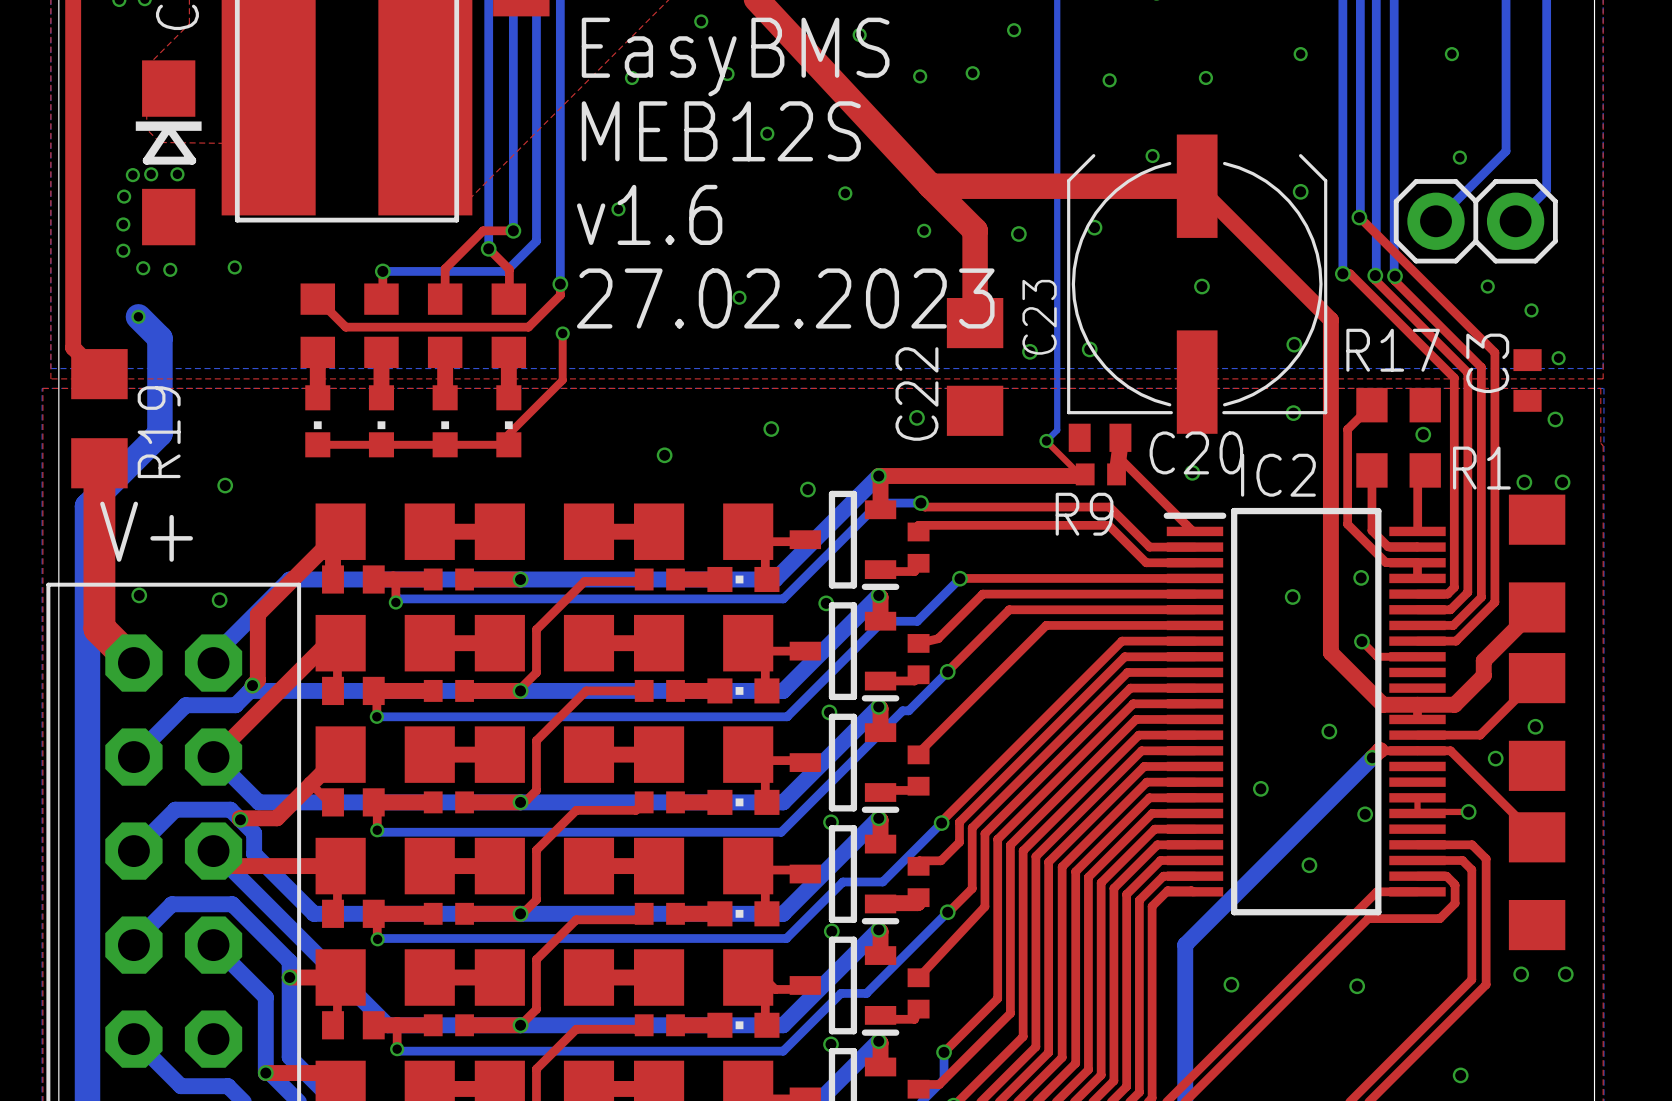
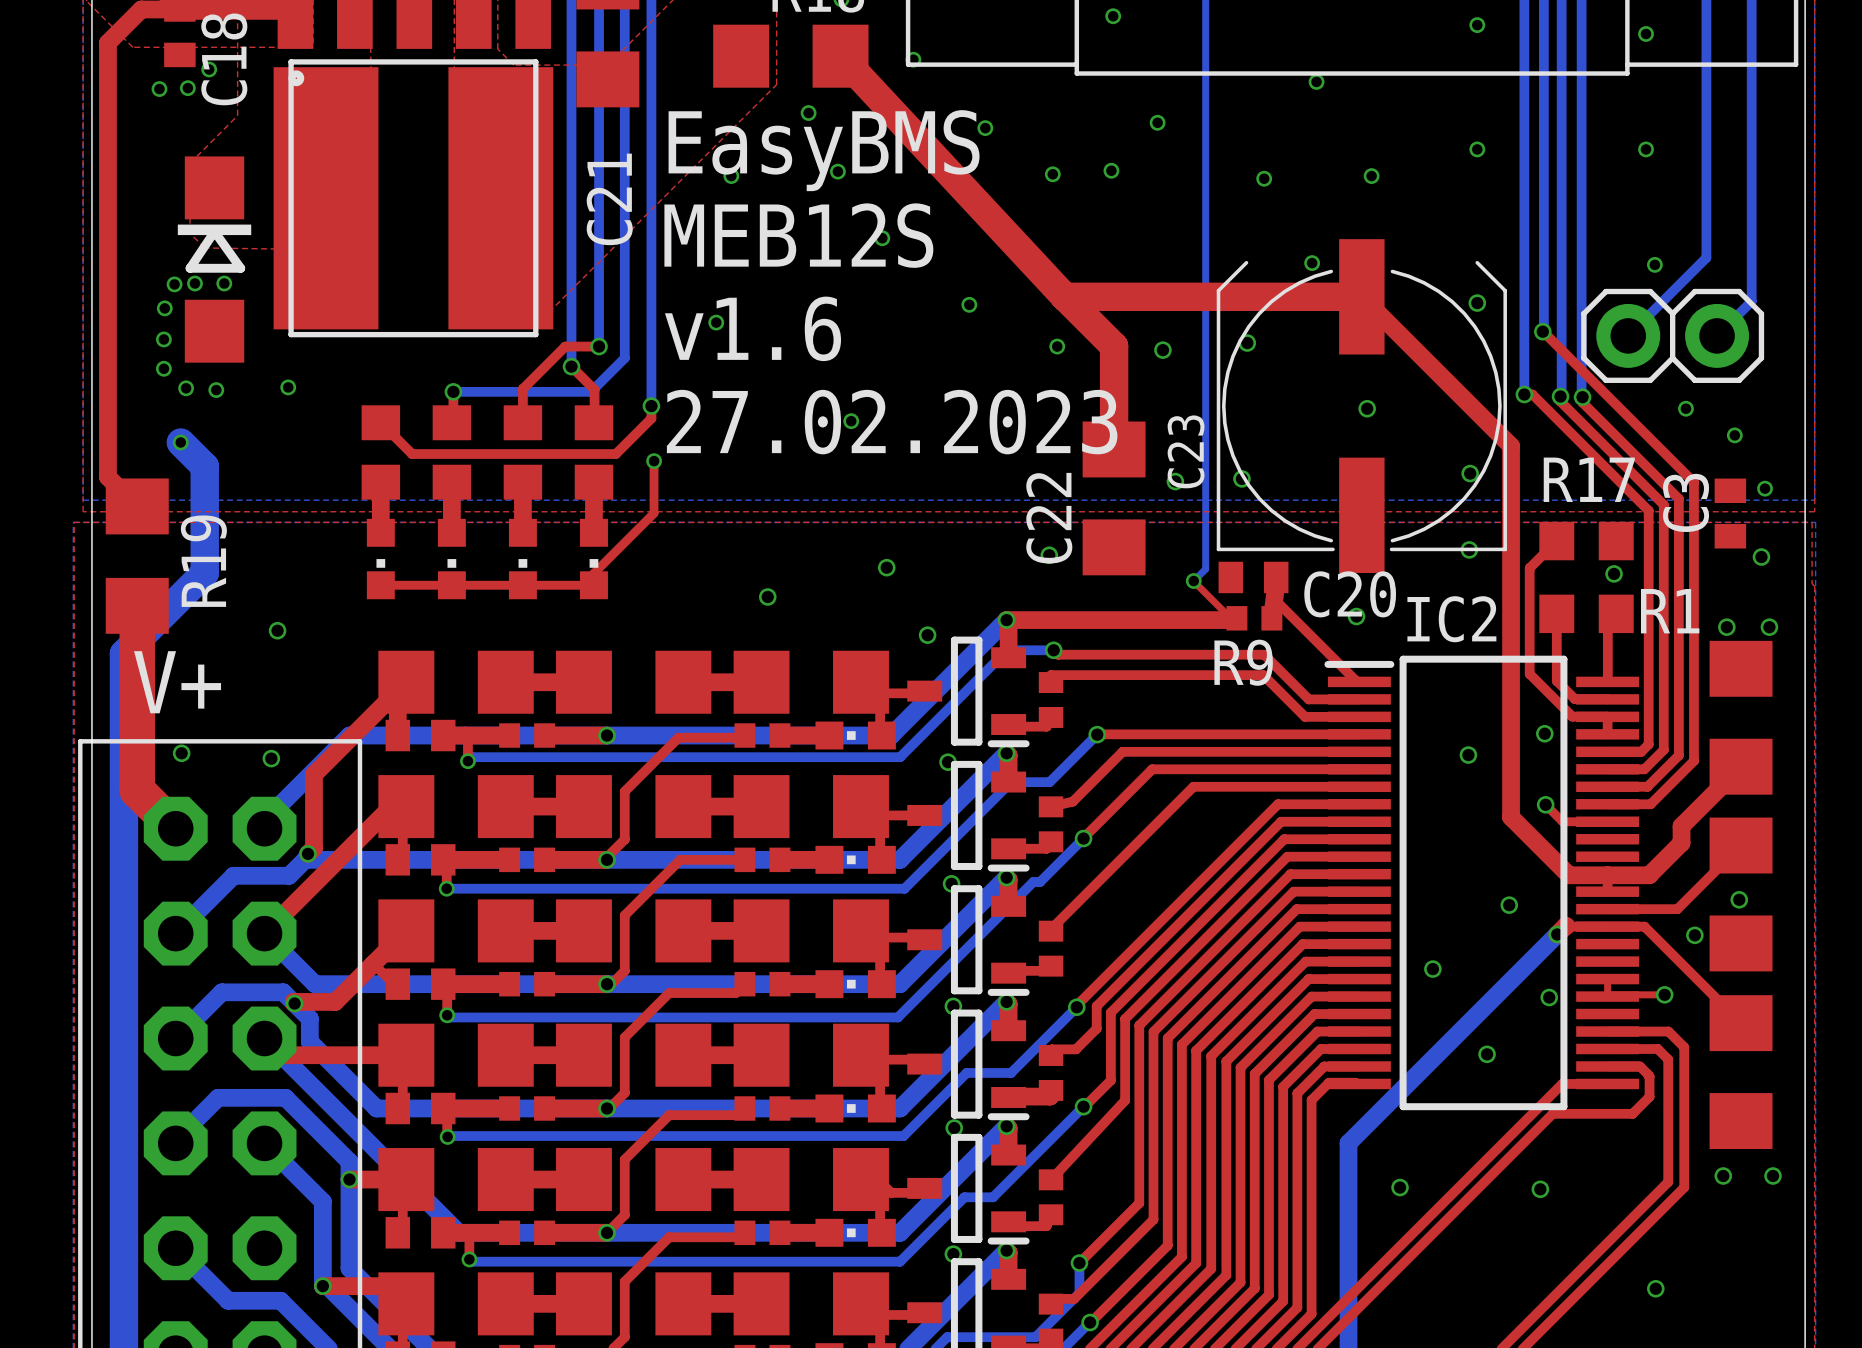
C21 name: none -> C21 (609, 199)

